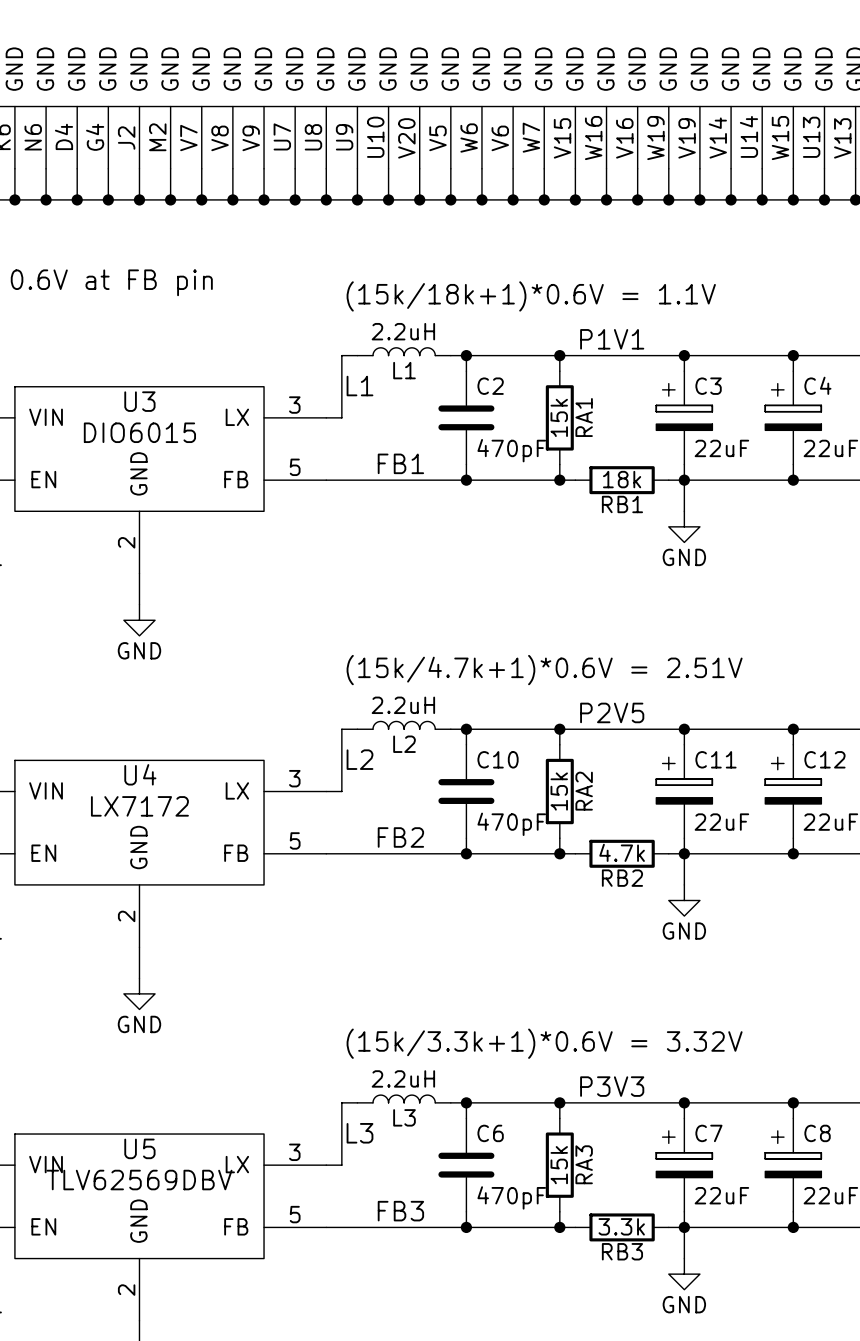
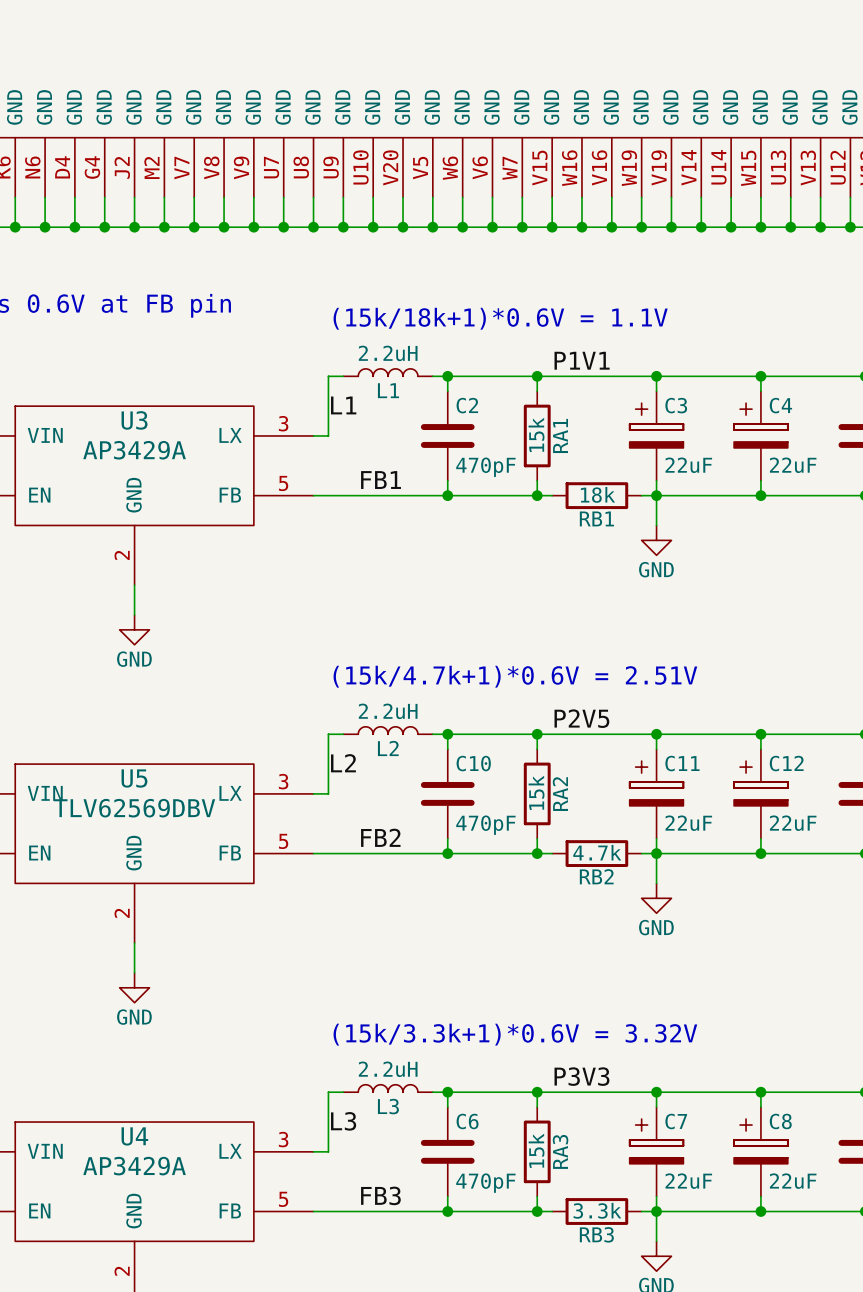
U3 value: DIO6015 (139, 432) -> AP3429A (134, 450)
U4 name: U4 (140, 774) -> U5 (134, 778)
U4 value: LX7172 (139, 806) -> TLV62569DBV (134, 808)
U5 name: U5 (139, 1148) -> U4 (134, 1136)
U5 value: TLV62569DBV (139, 1180) -> AP3429A (134, 1166)

